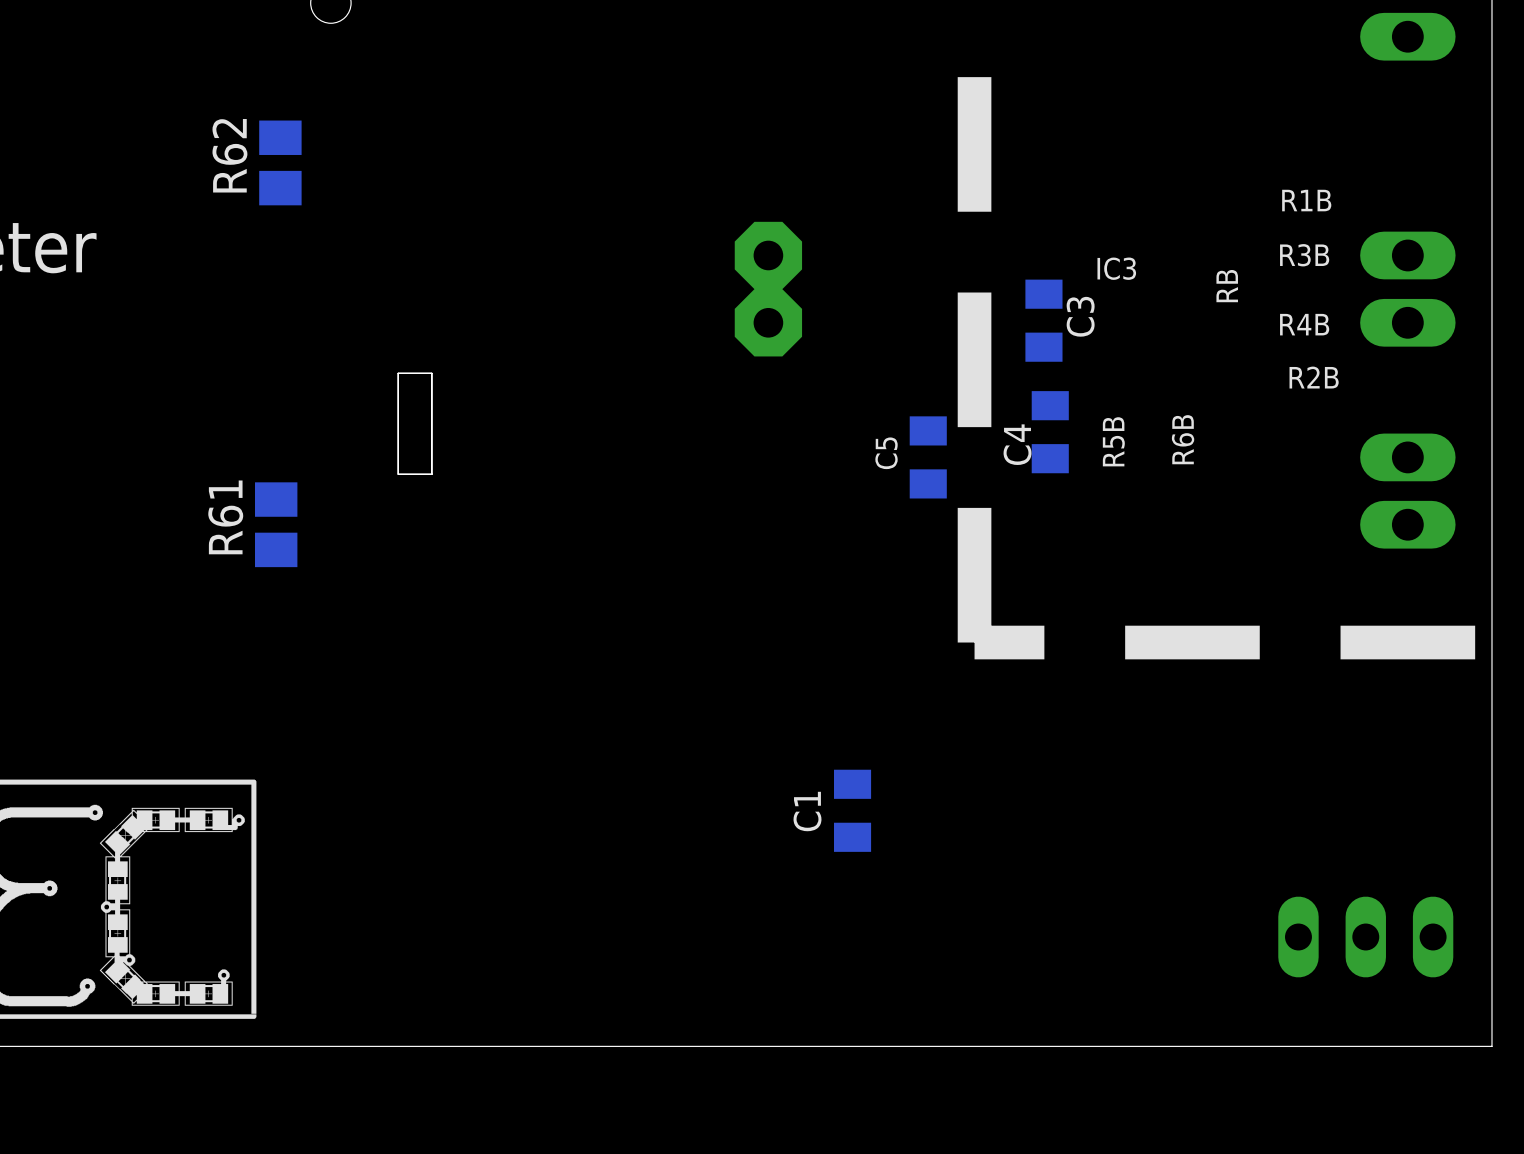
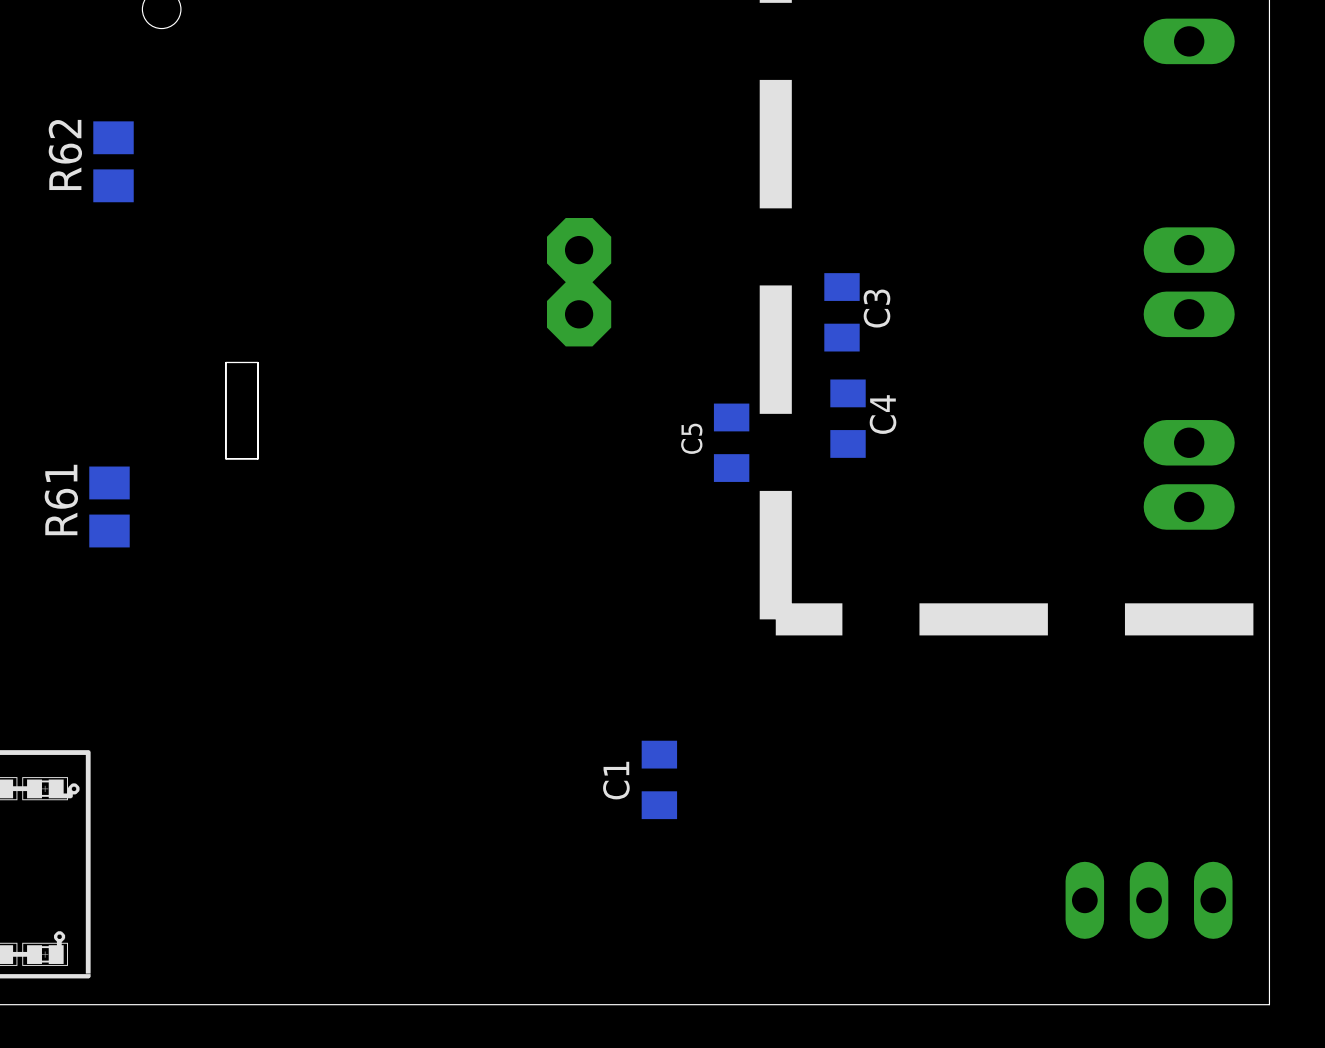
R1B: (1306, 200) -> none
R3B: (1304, 255) -> none
IC3: (1116, 268) -> none
RB: (1227, 286) -> none
R4B: (1304, 324) -> none
R2B: (1314, 377) -> none
R6B: (1183, 439) -> none
R5B: (1113, 441) -> none
C4 name position: C4 (1017, 444) -> C4 (883, 414)

